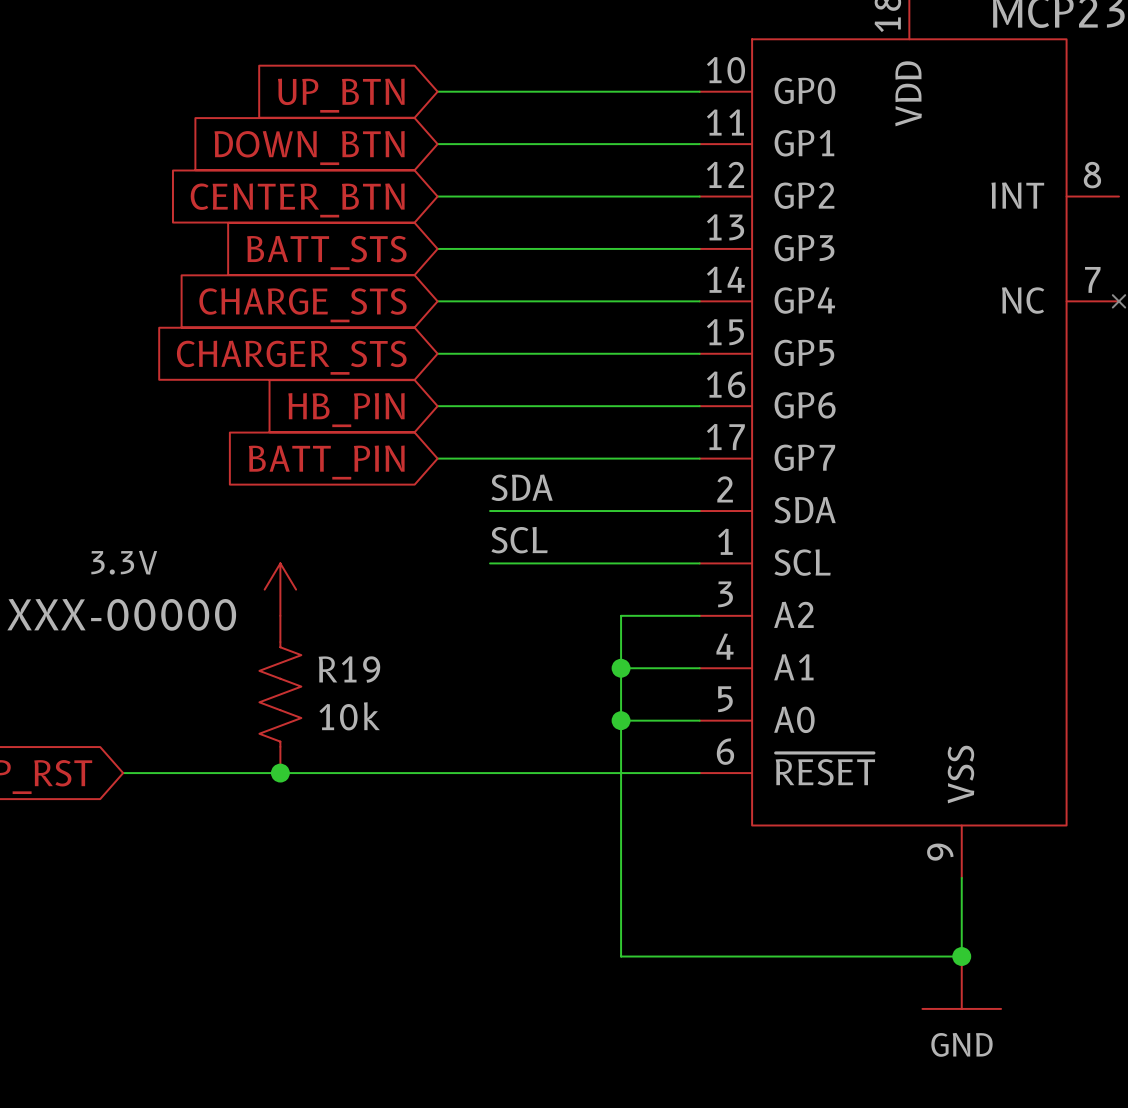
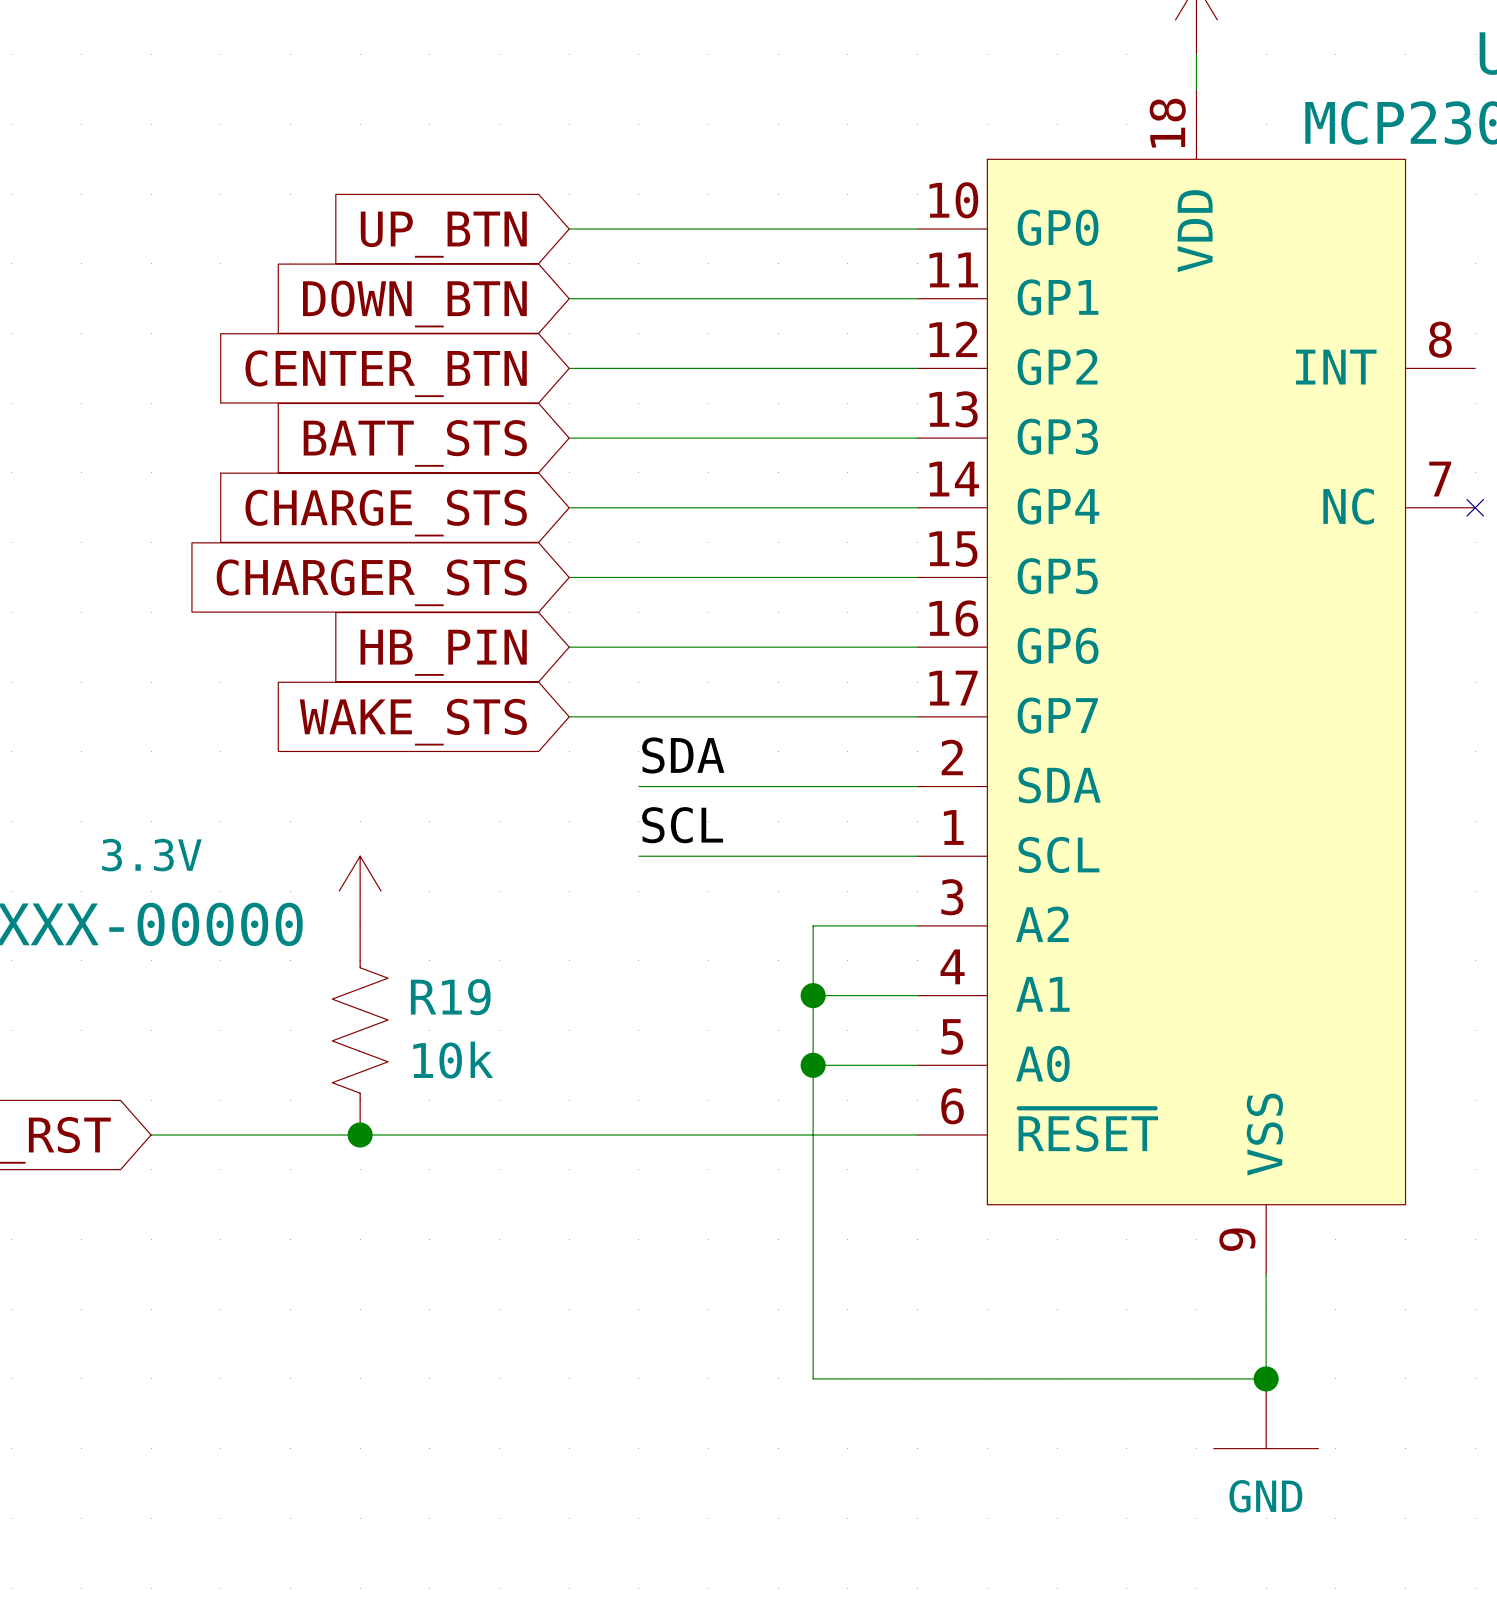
global label: BATT_PIN (326, 462) -> WAKE_STS (413, 722)

